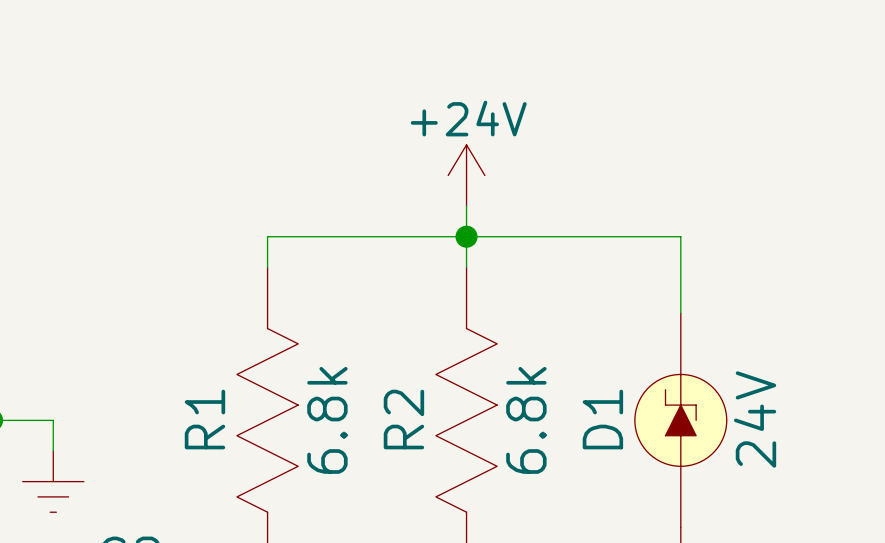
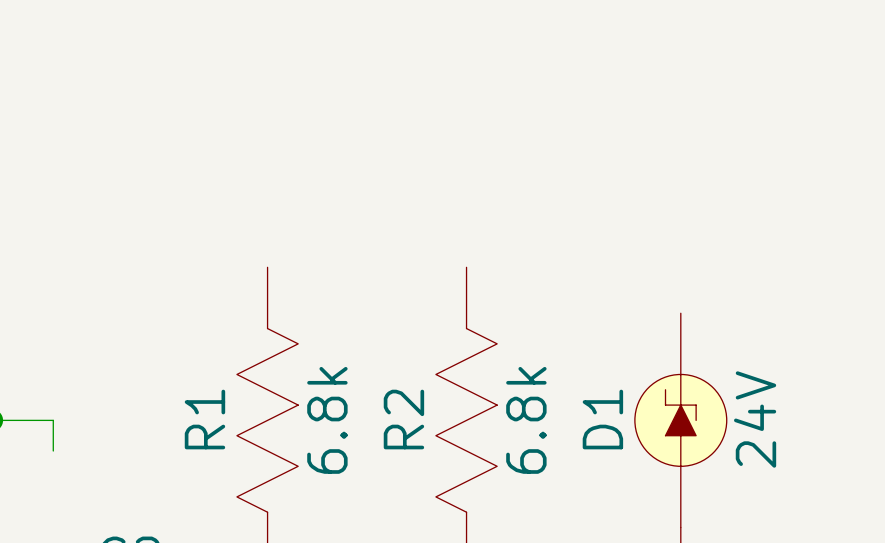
power symbol: +24V (466, 175) -> none
wire: (466, 206) (466, 267) -> none
junction: (466, 236) -> none
wire: (267, 267) (267, 236) (680, 236) (680, 313) -> none
power symbol: (53, 481) -> none

